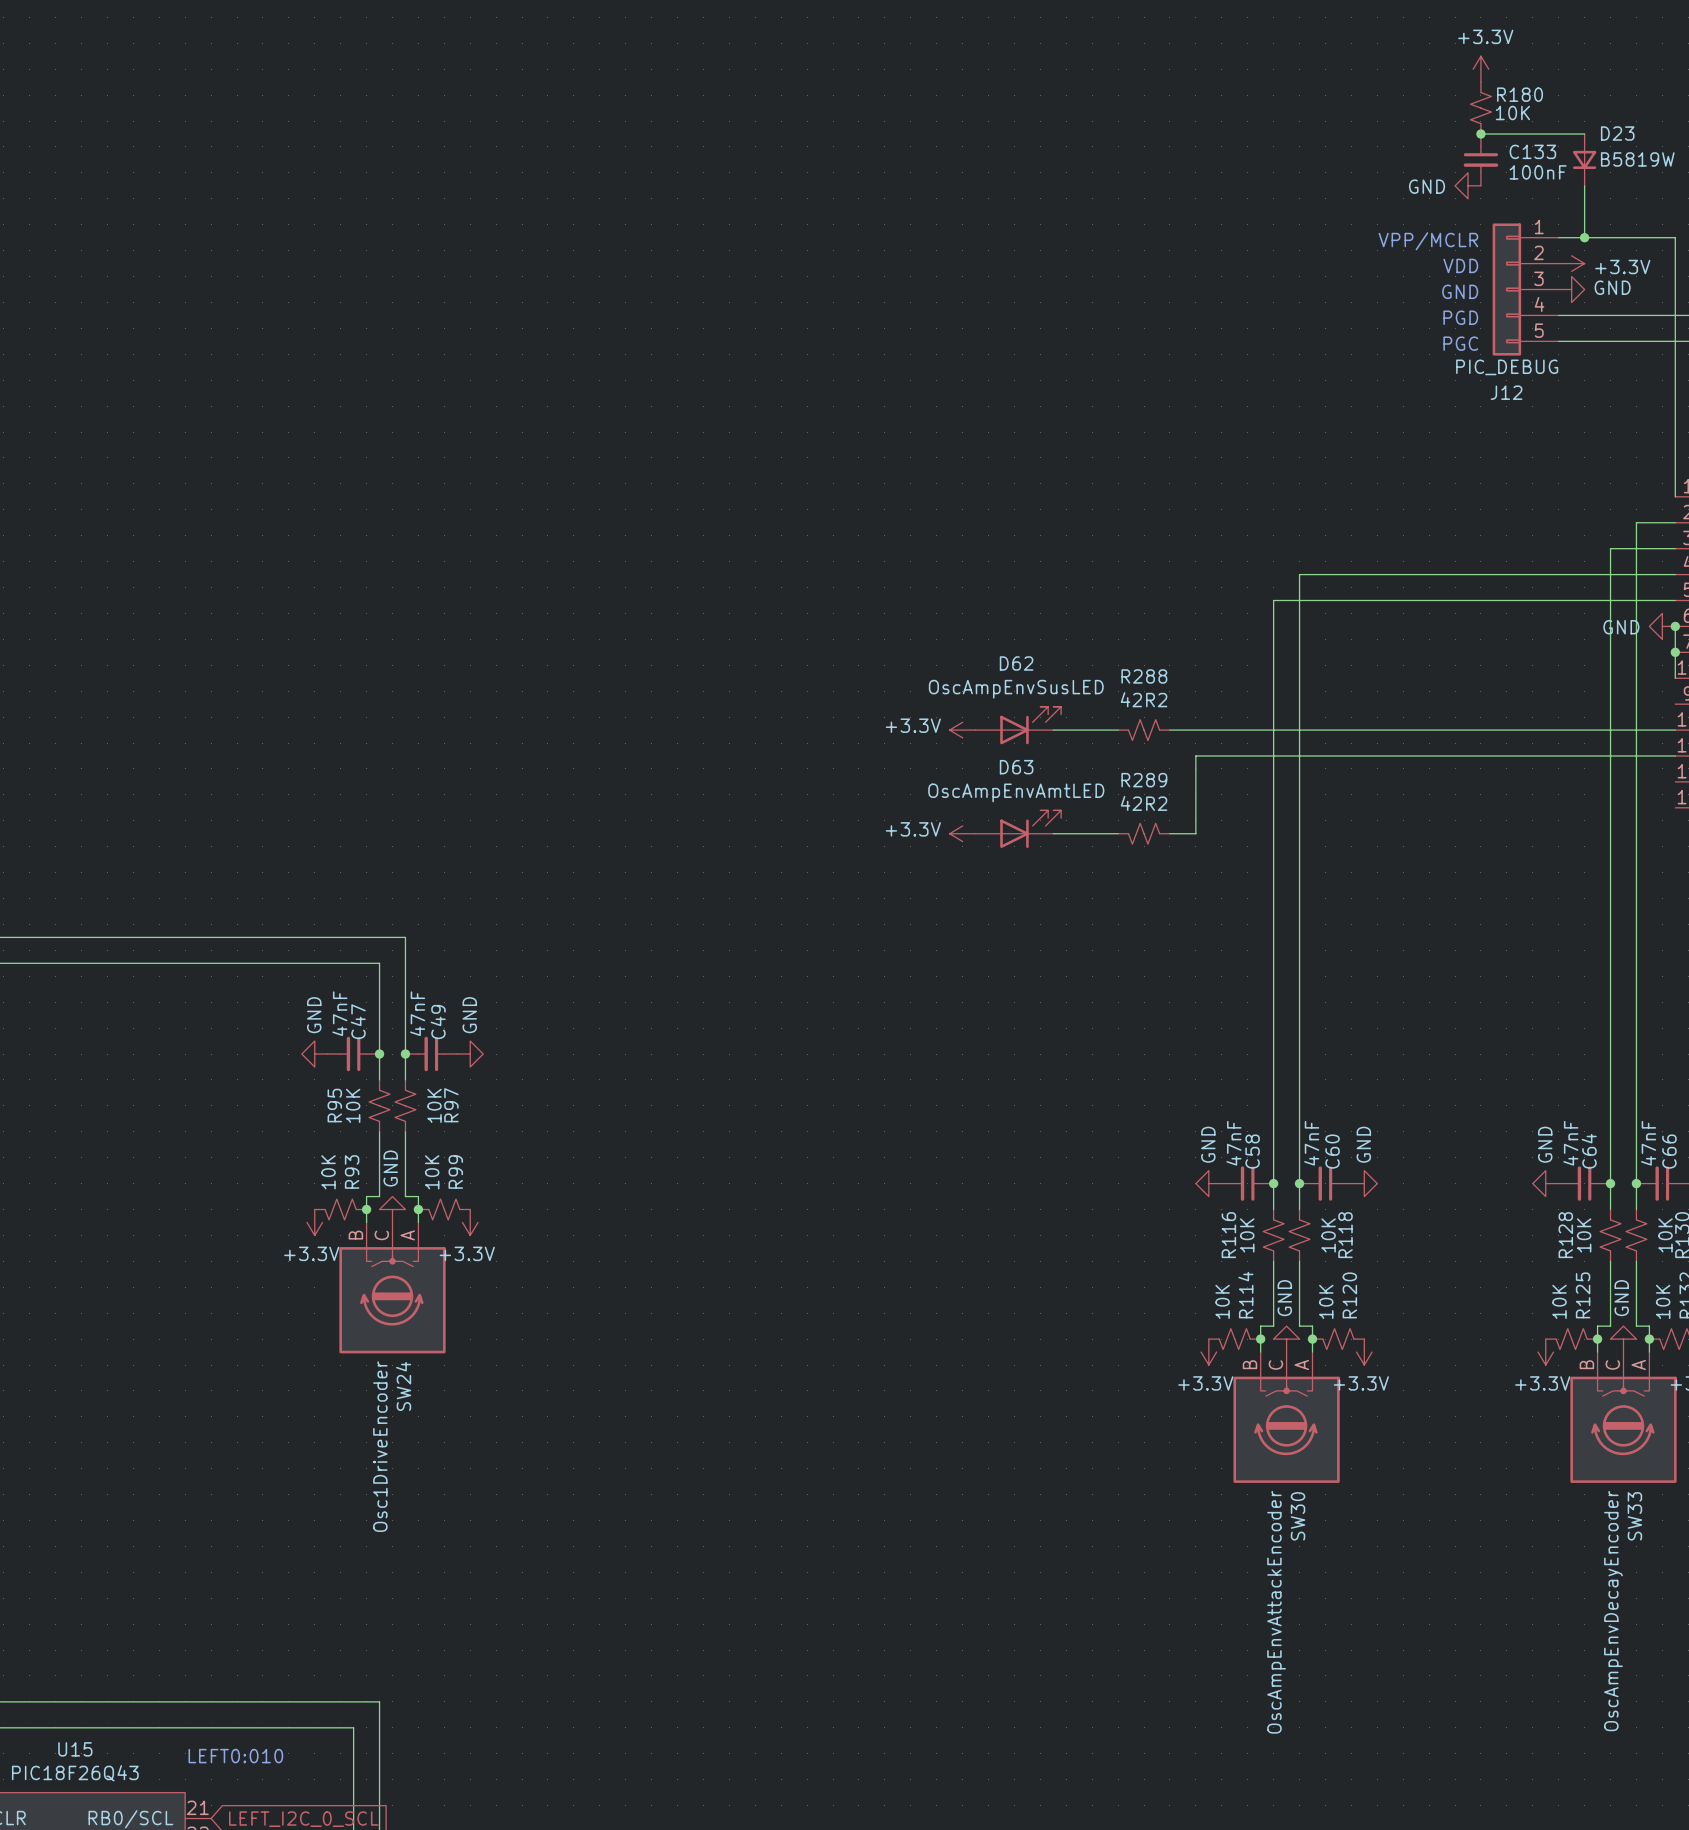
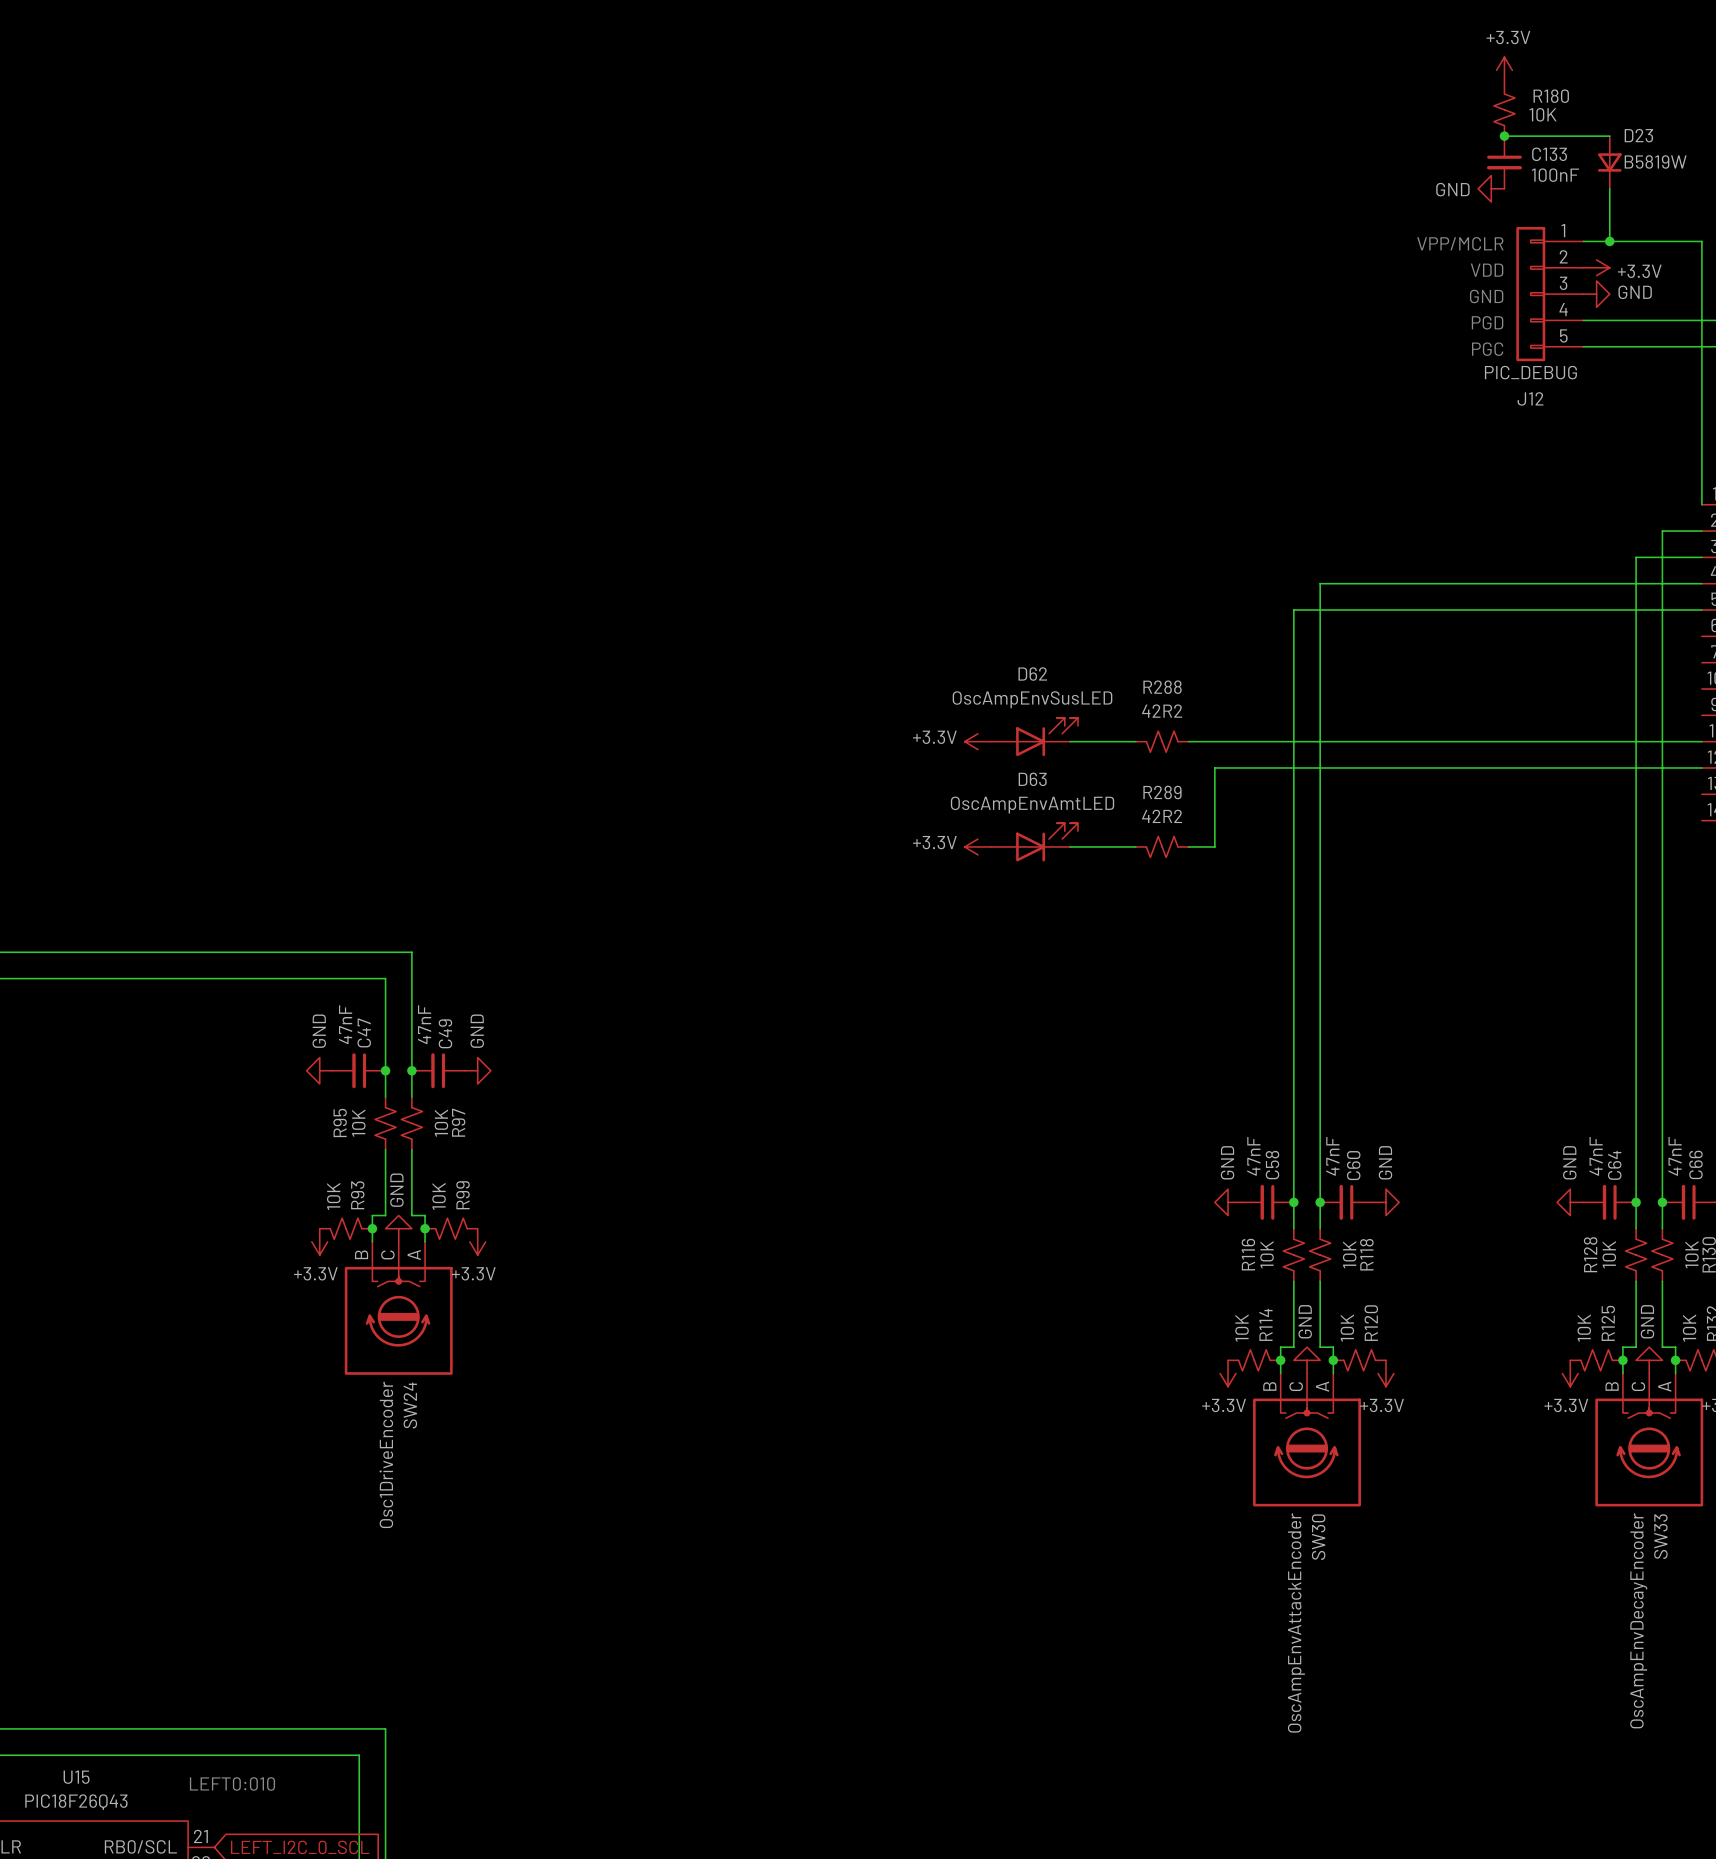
power symbol: GND (1662, 626) -> none
wire: (1675, 626) (1675, 678) -> none
junction: (1675, 626) -> none
junction: (1675, 652) -> none

